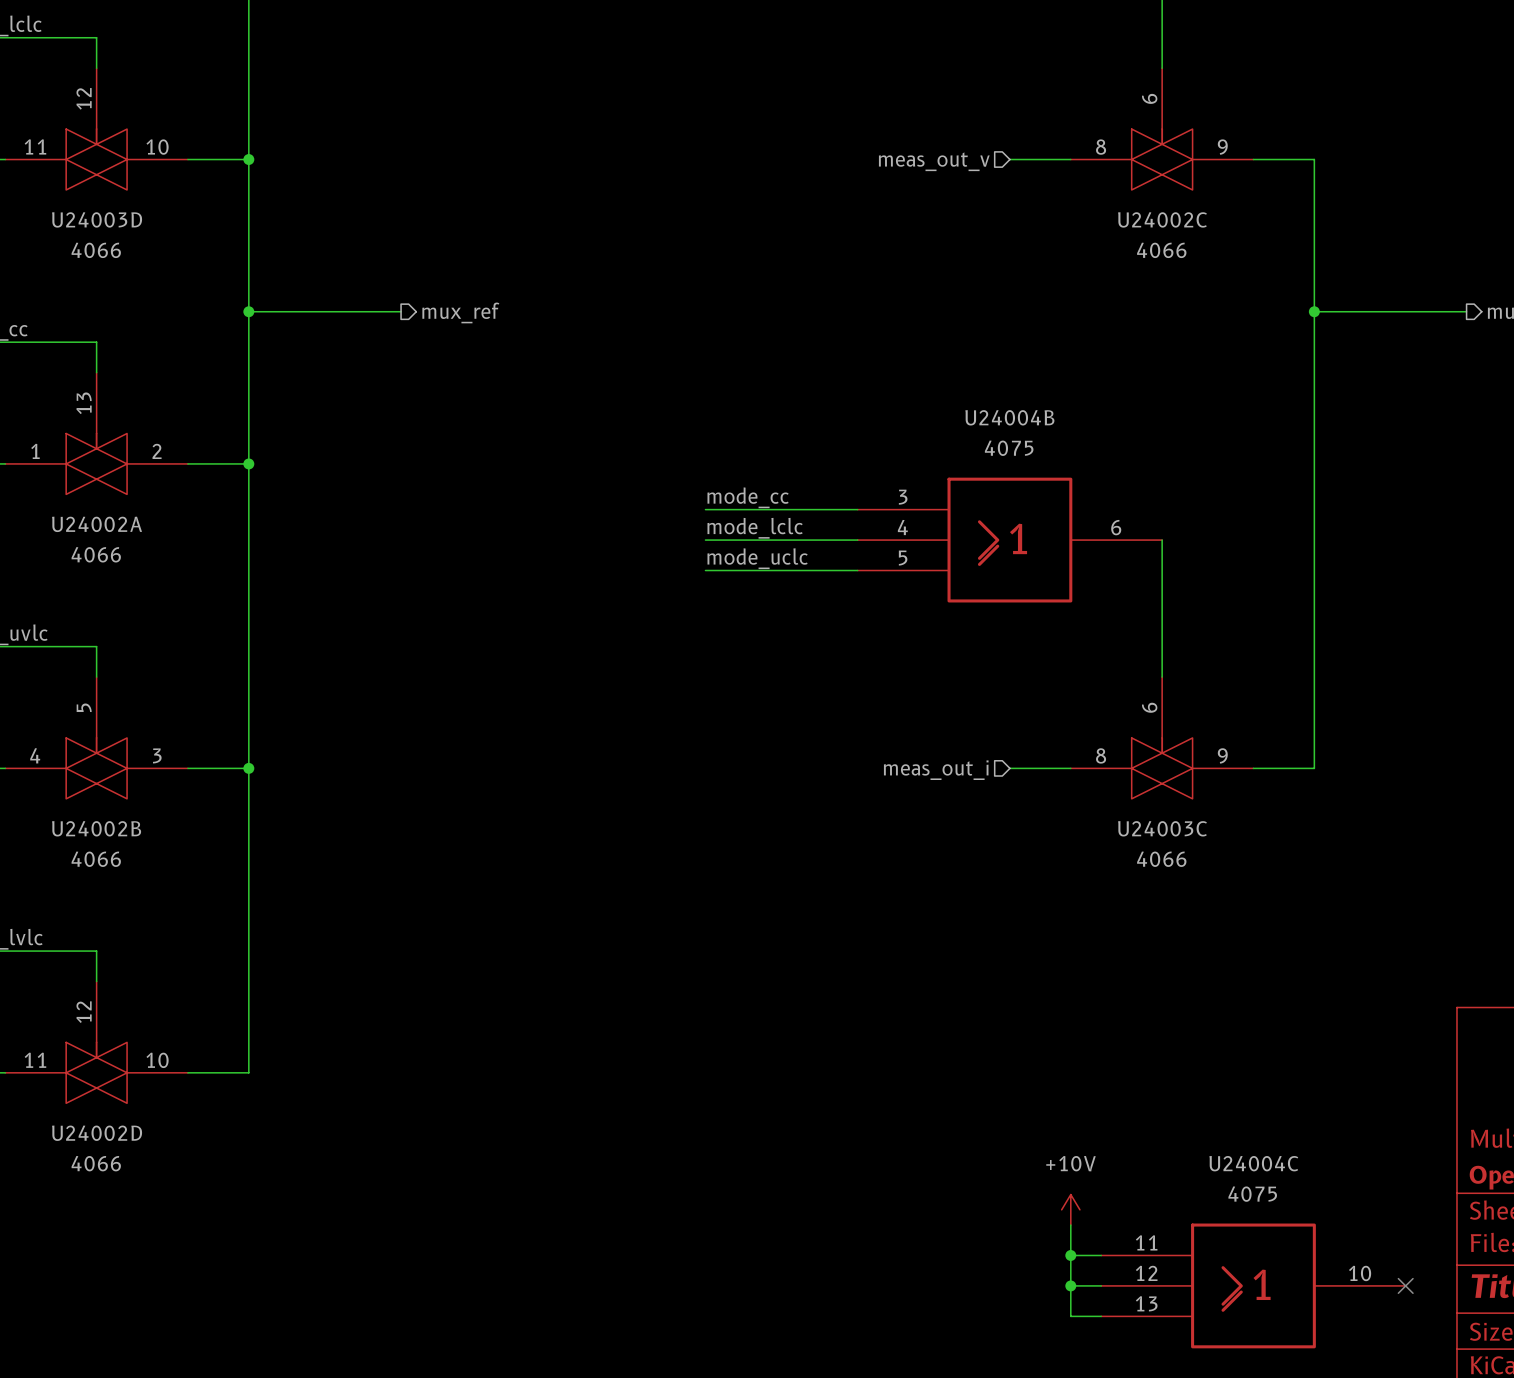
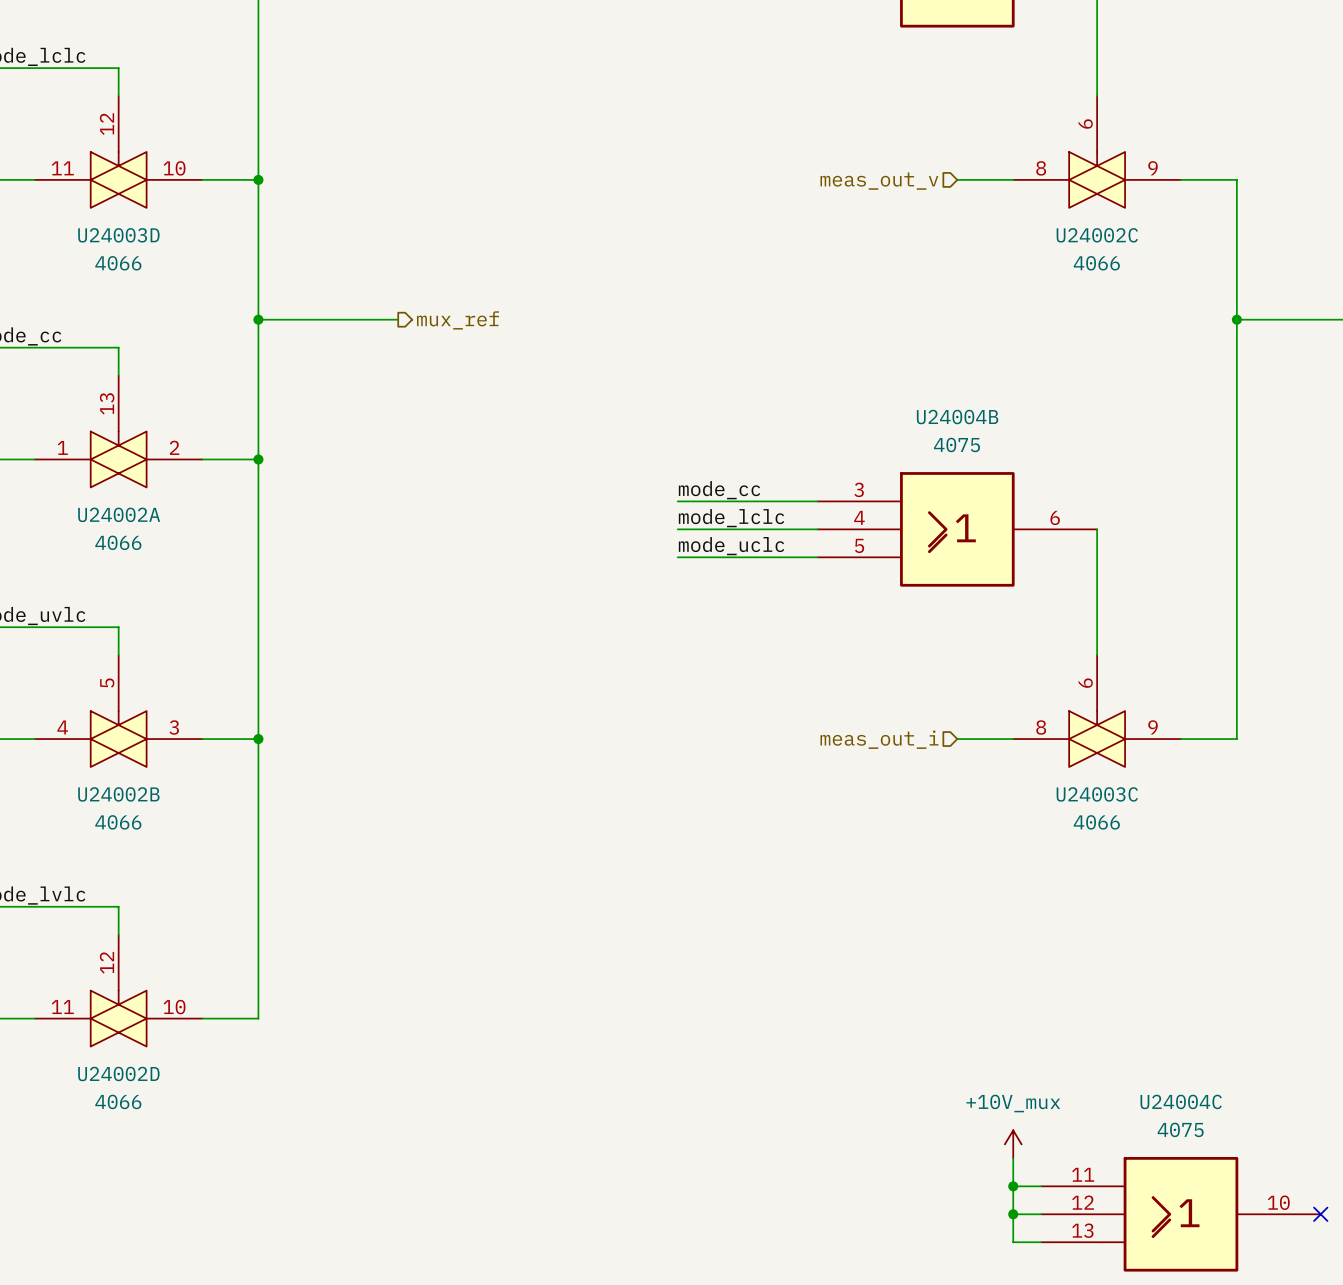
power symbol: +10V (1070, 1209) -> +10V_mux (1013, 1144)

